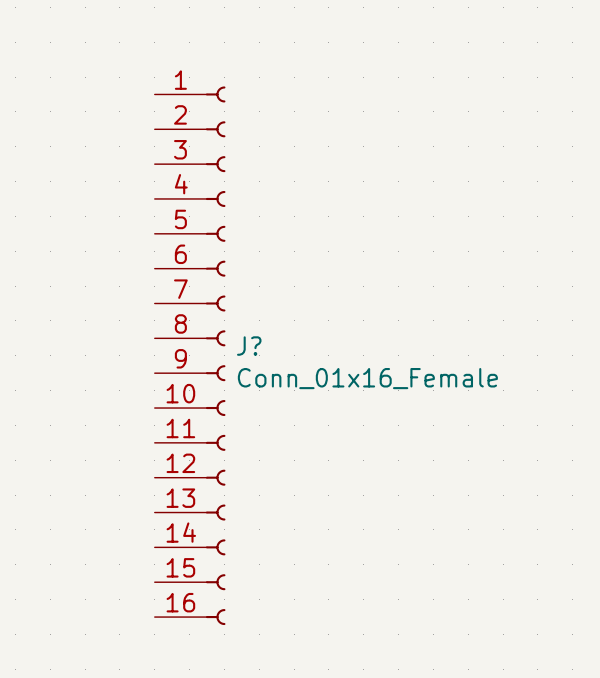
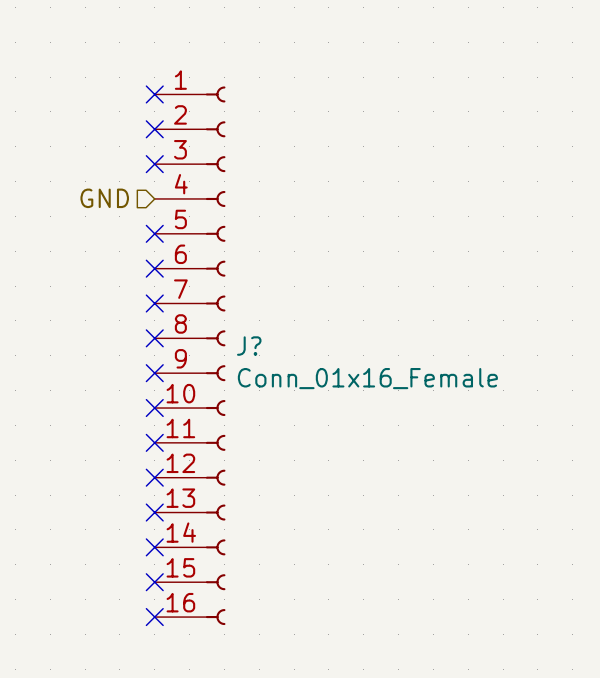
no-connect mark: none -> (154, 94)
no-connect mark: none -> (154, 129)
no-connect mark: none -> (154, 164)
hierarchical label: none -> GND (104, 198)
no-connect mark: none -> (154, 233)
no-connect mark: none -> (154, 268)
no-connect mark: none -> (154, 303)
no-connect mark: none -> (154, 338)
no-connect mark: none -> (154, 373)
no-connect mark: none -> (154, 408)
no-connect mark: none -> (154, 442)
no-connect mark: none -> (154, 477)
no-connect mark: none -> (154, 512)
no-connect mark: none -> (154, 547)
no-connect mark: none -> (154, 582)
no-connect mark: none -> (154, 617)

